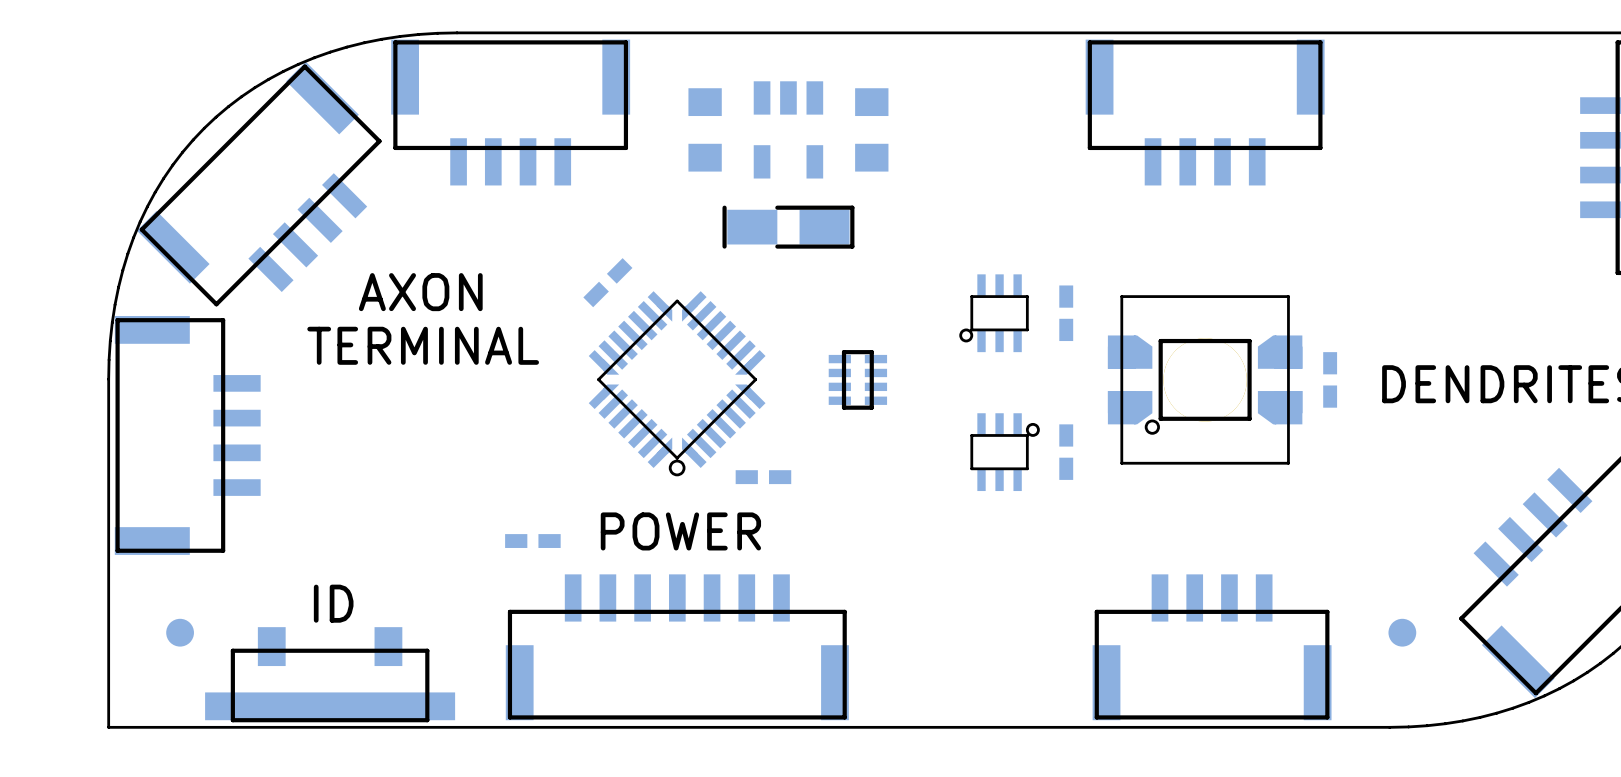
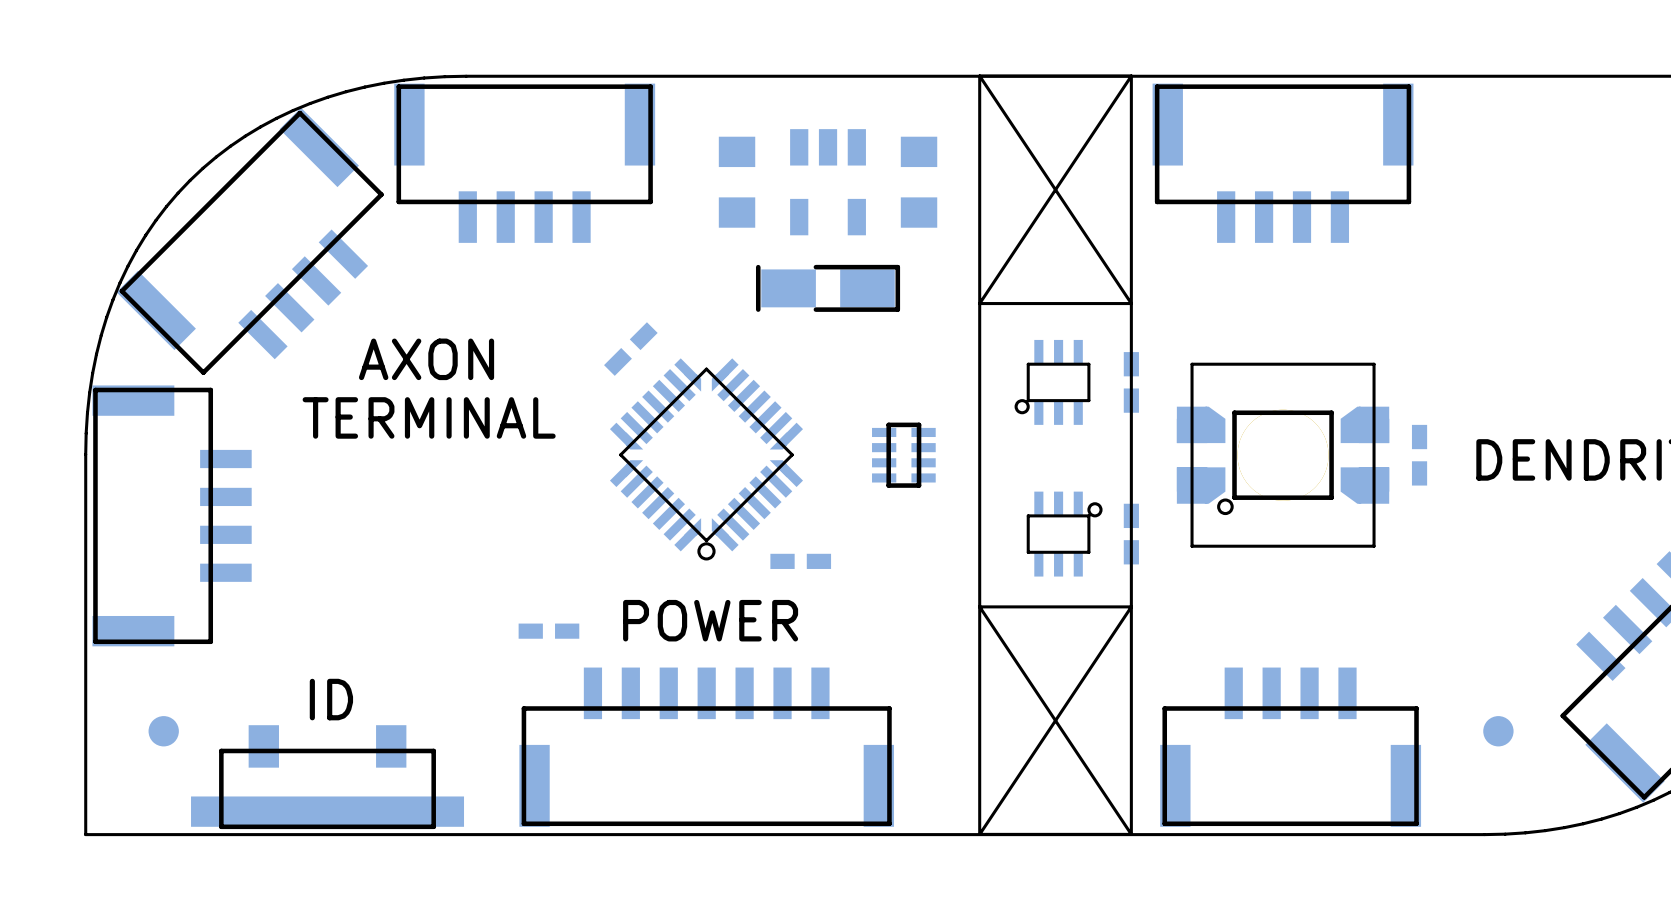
drawing: none -> [978, 74, 1133, 836]

